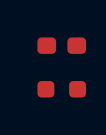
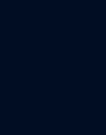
part: (61, 45) -> none
part: (61, 89) -> none

